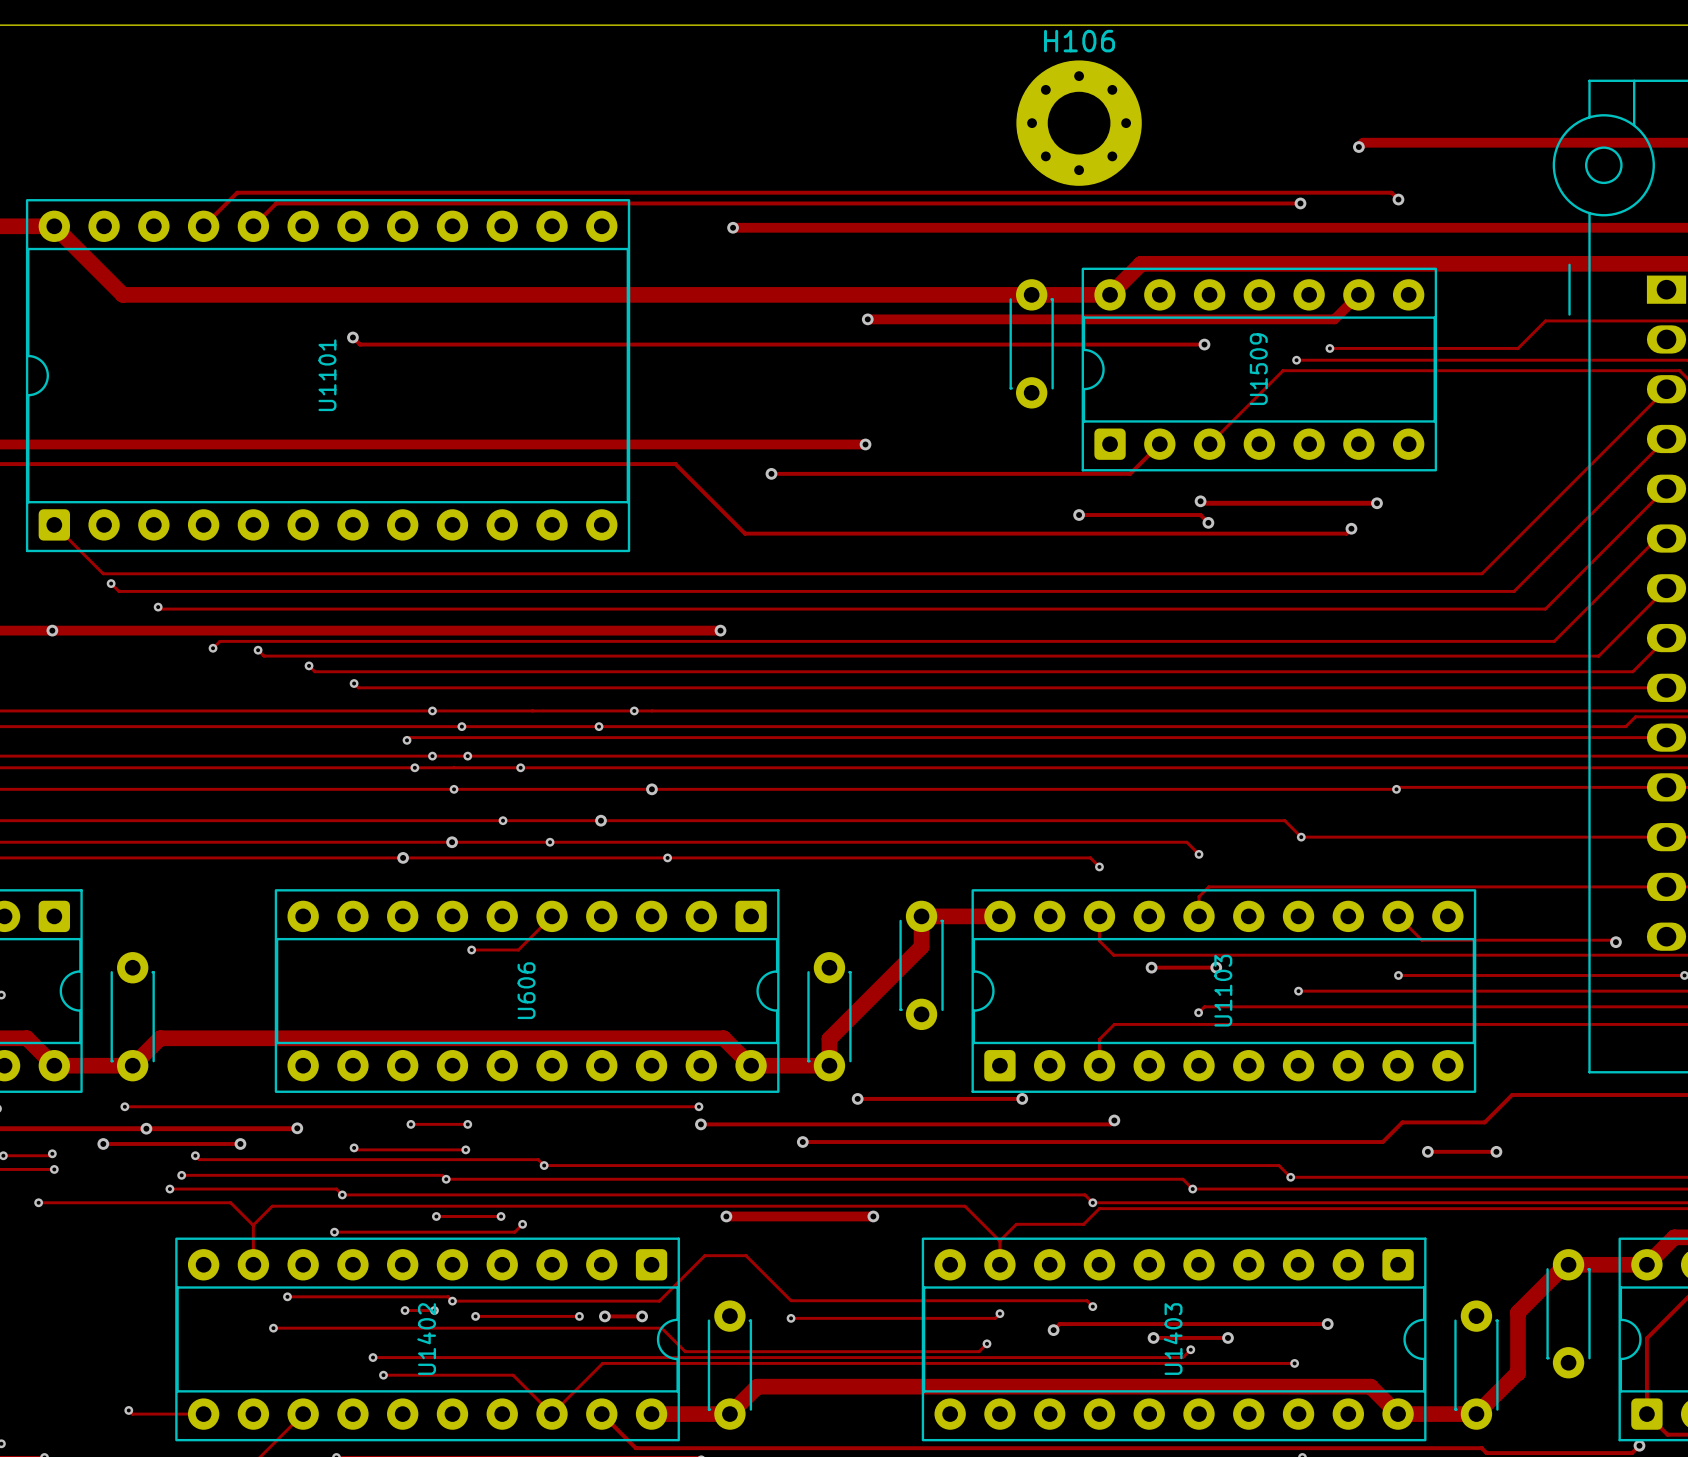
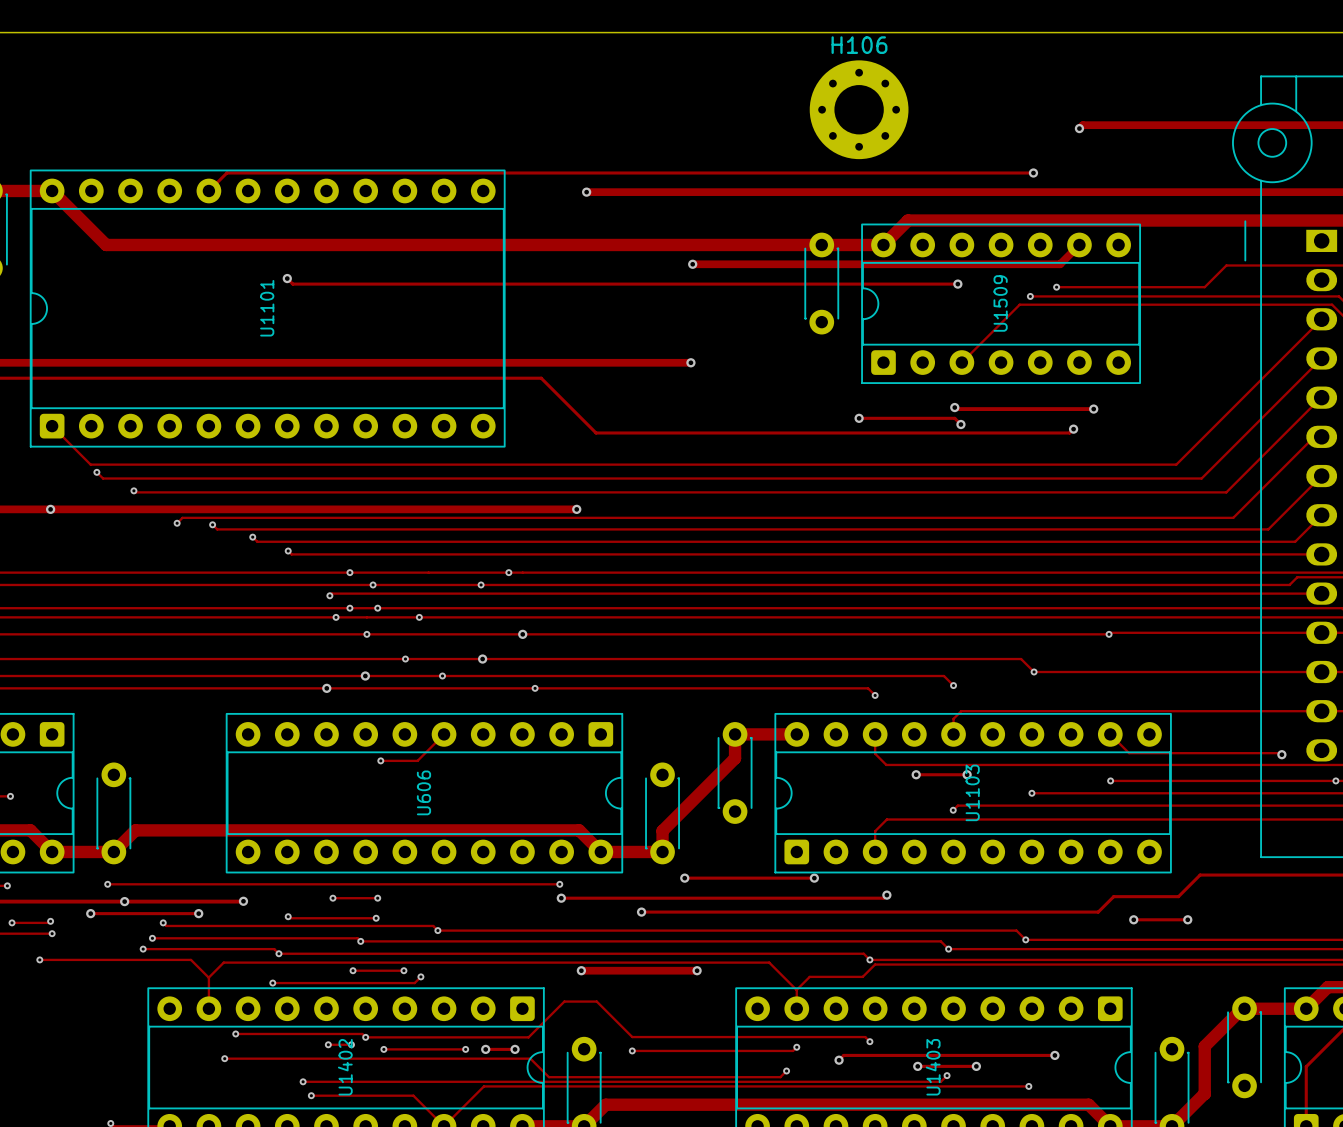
track: (1398, 199) (1391, 192) (237, 192) (203, 226) -> none
via: (1398, 199) -> none
track: (1159, 444) (1130, 473) (771, 473) -> none
via: (771, 473) -> none

